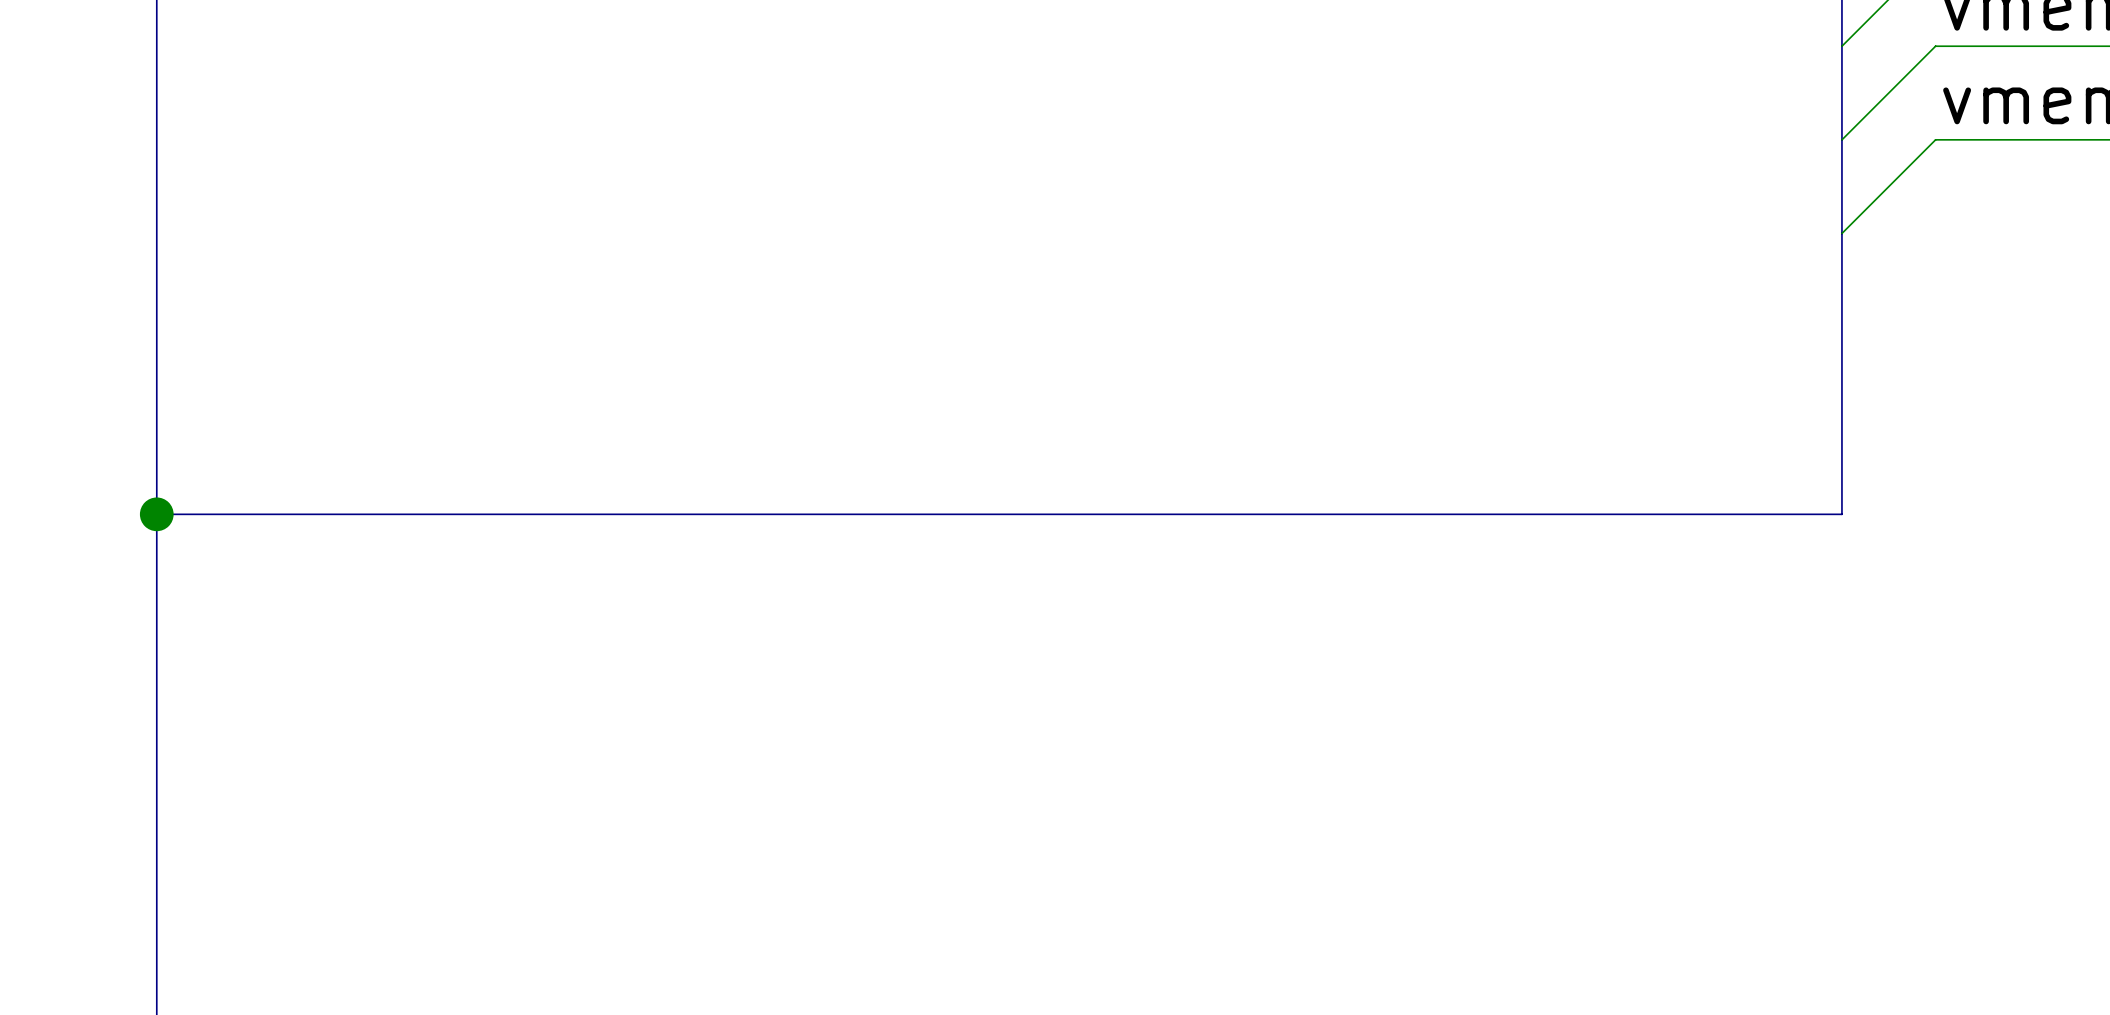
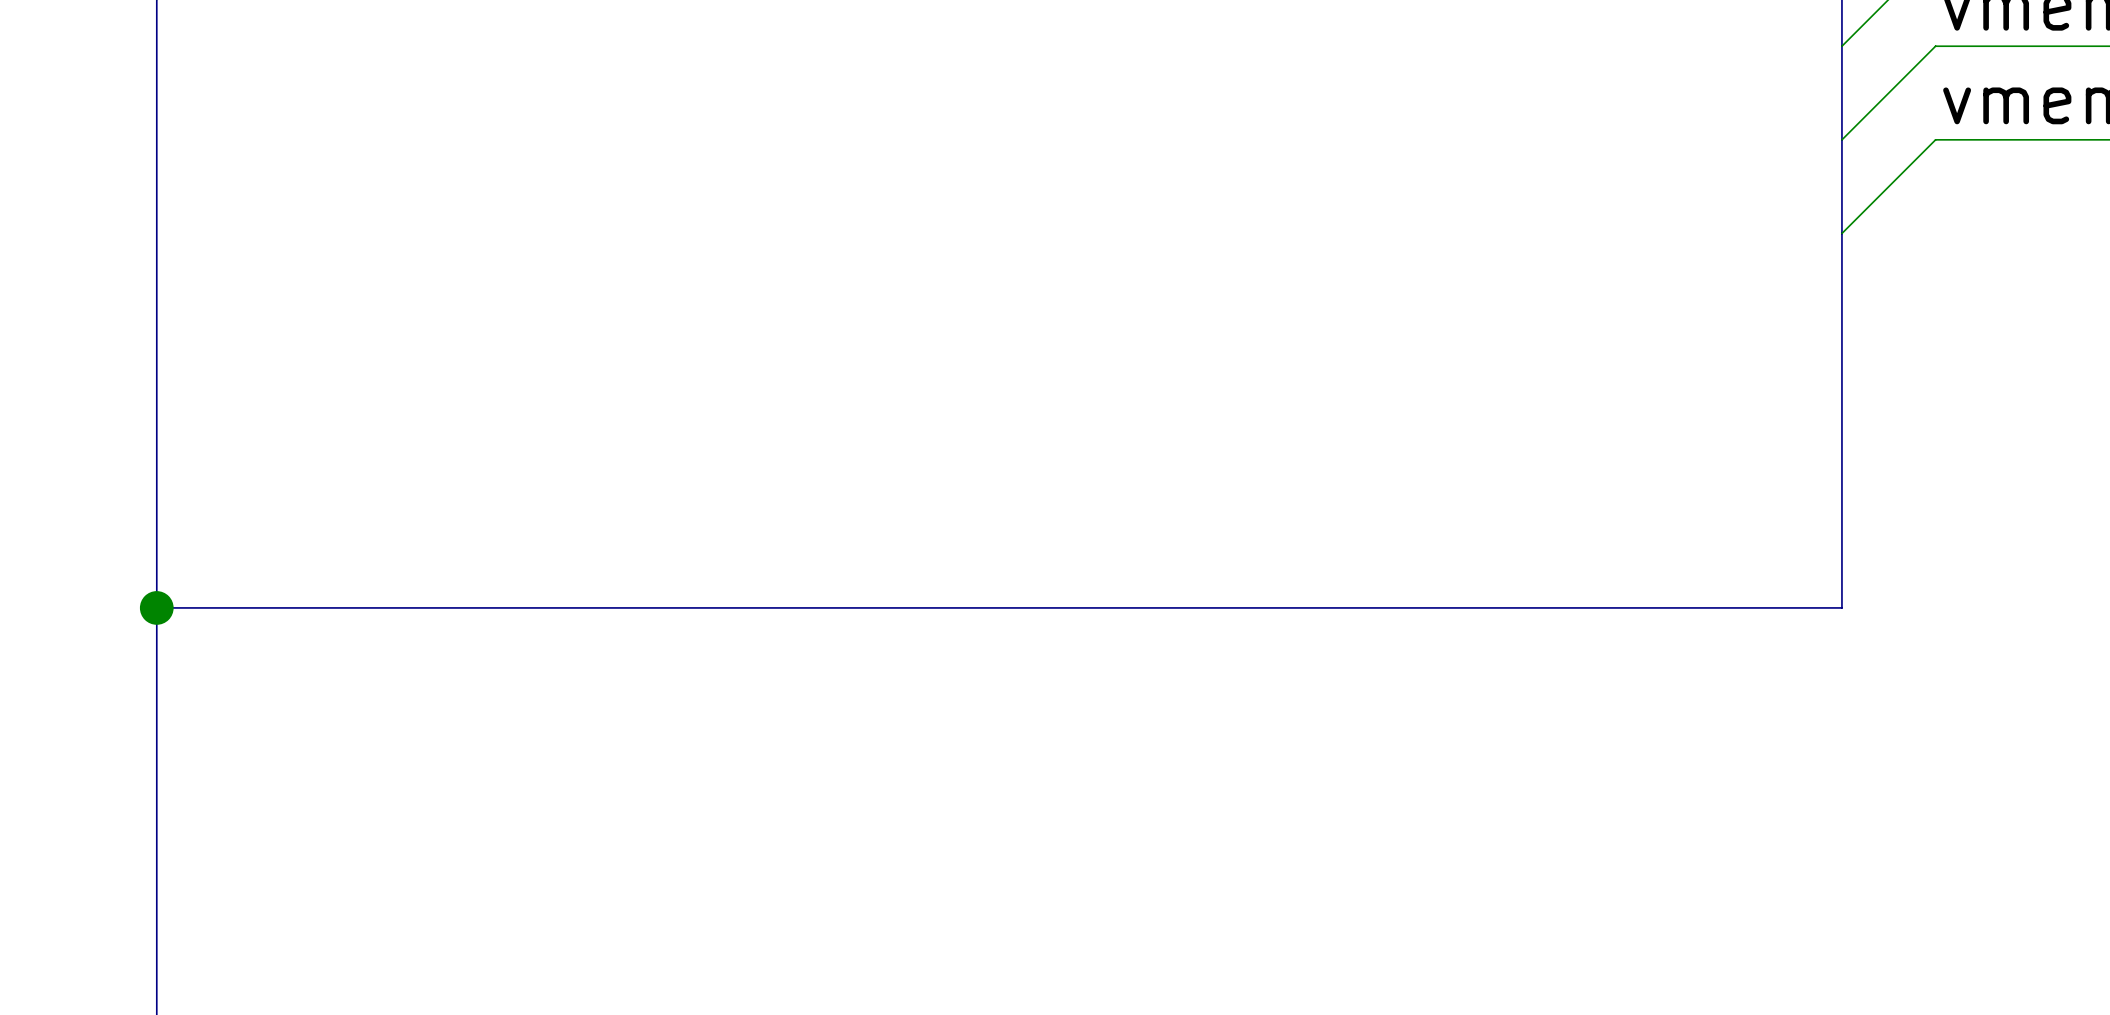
bus: (156, 514) (1841, 514) -> (156, 607) (1841, 607) (1841, 514)
junction position: (156, 514) -> (156, 607)

